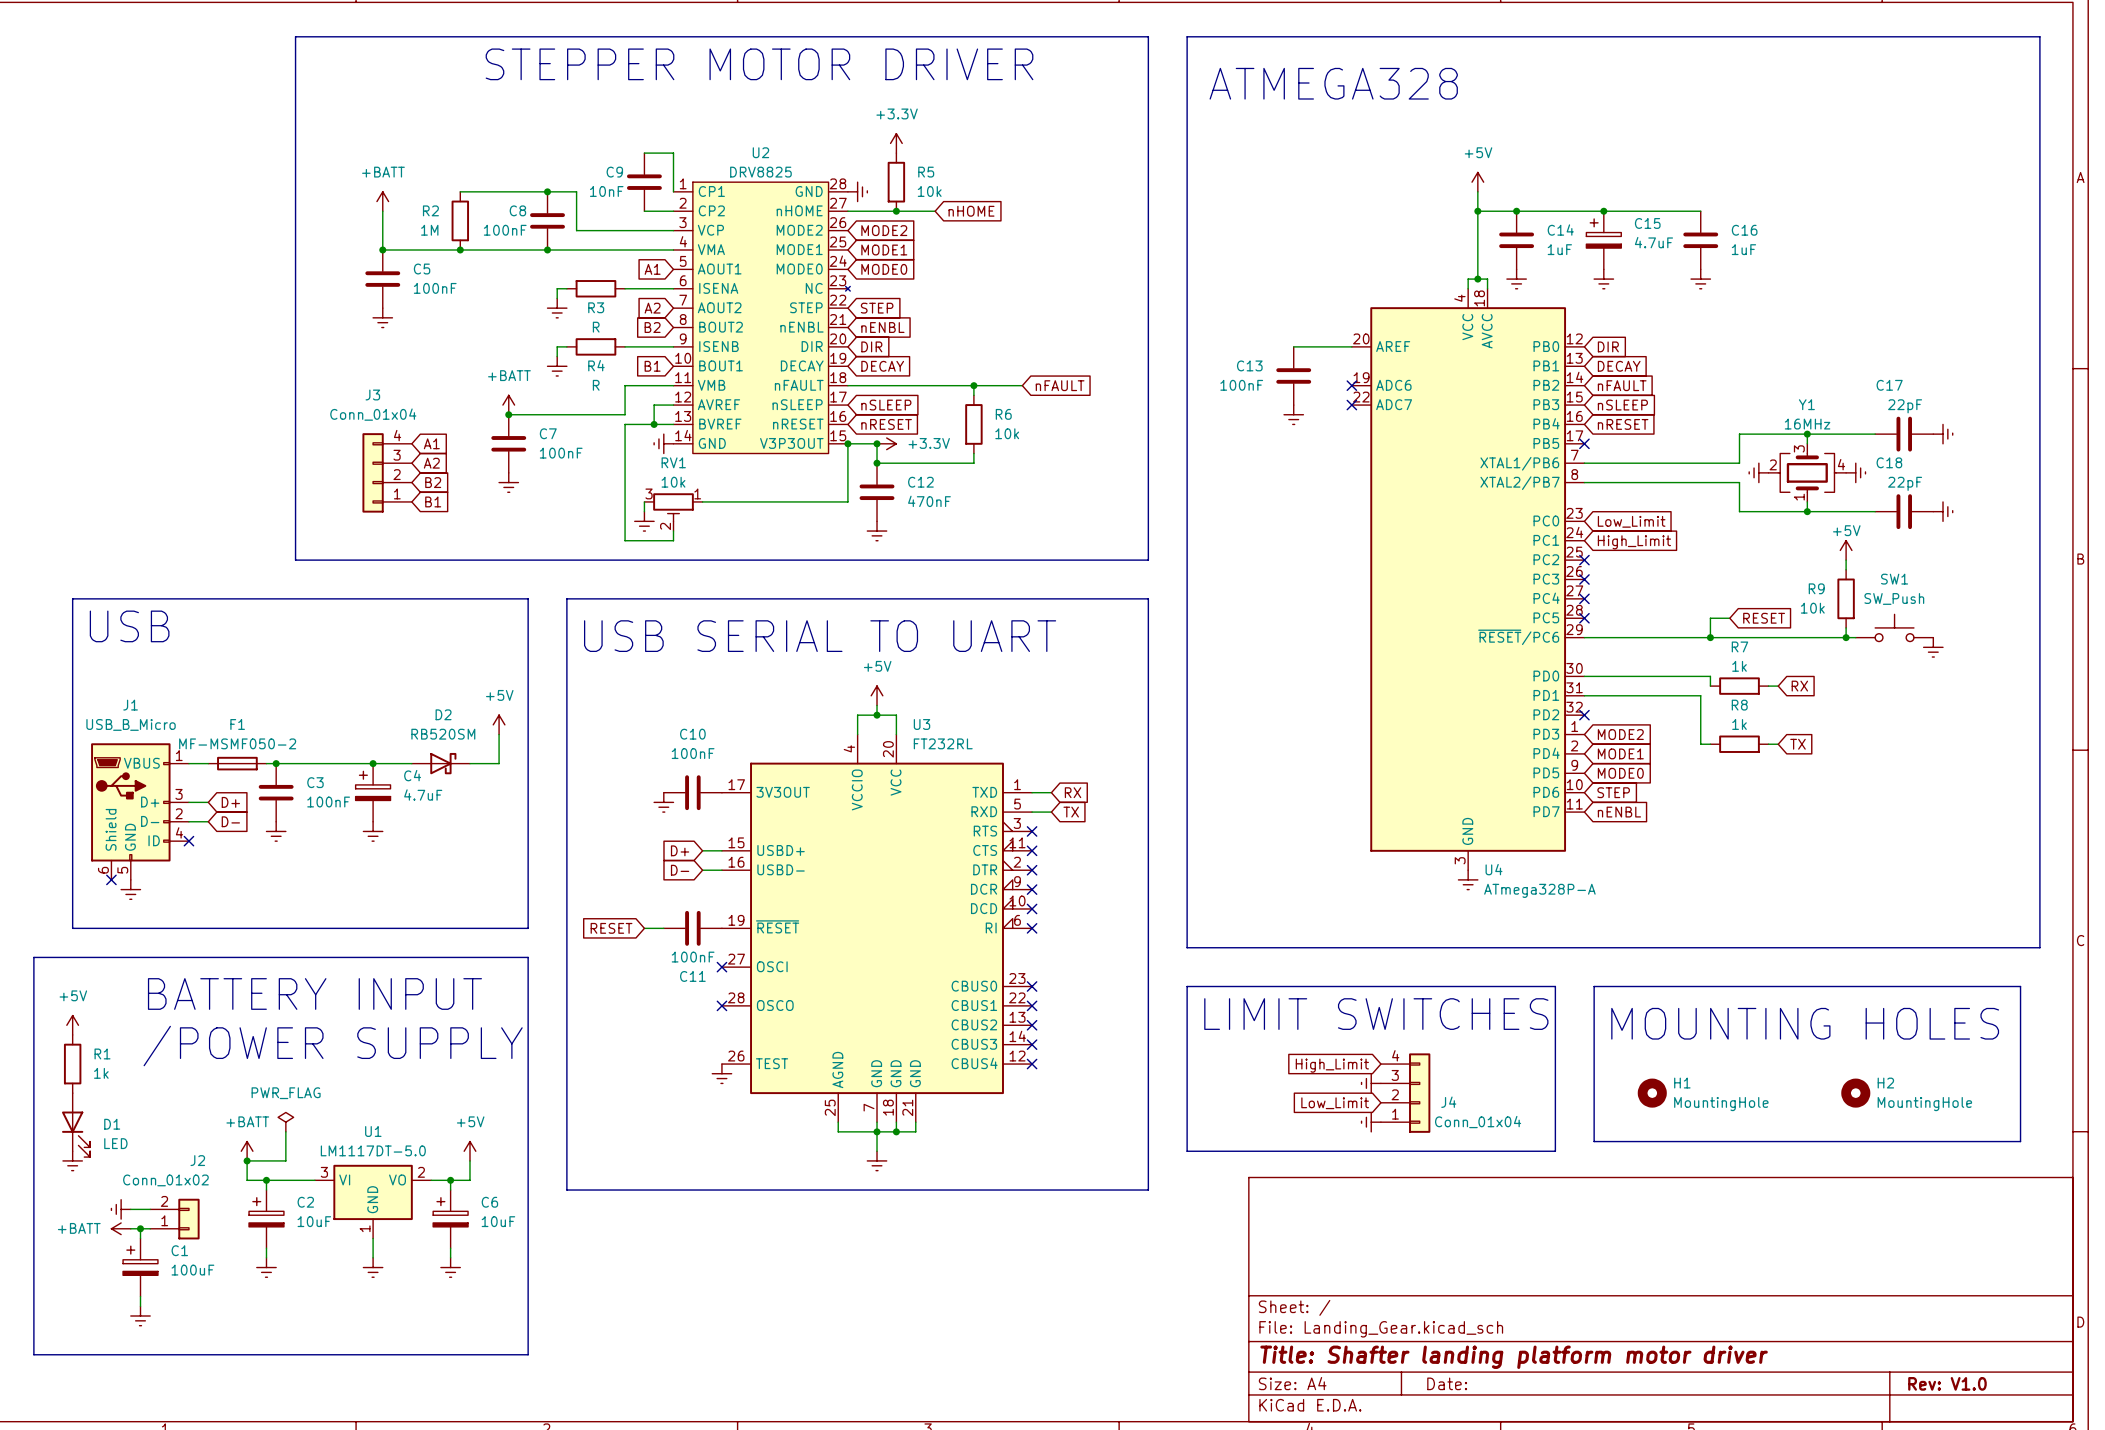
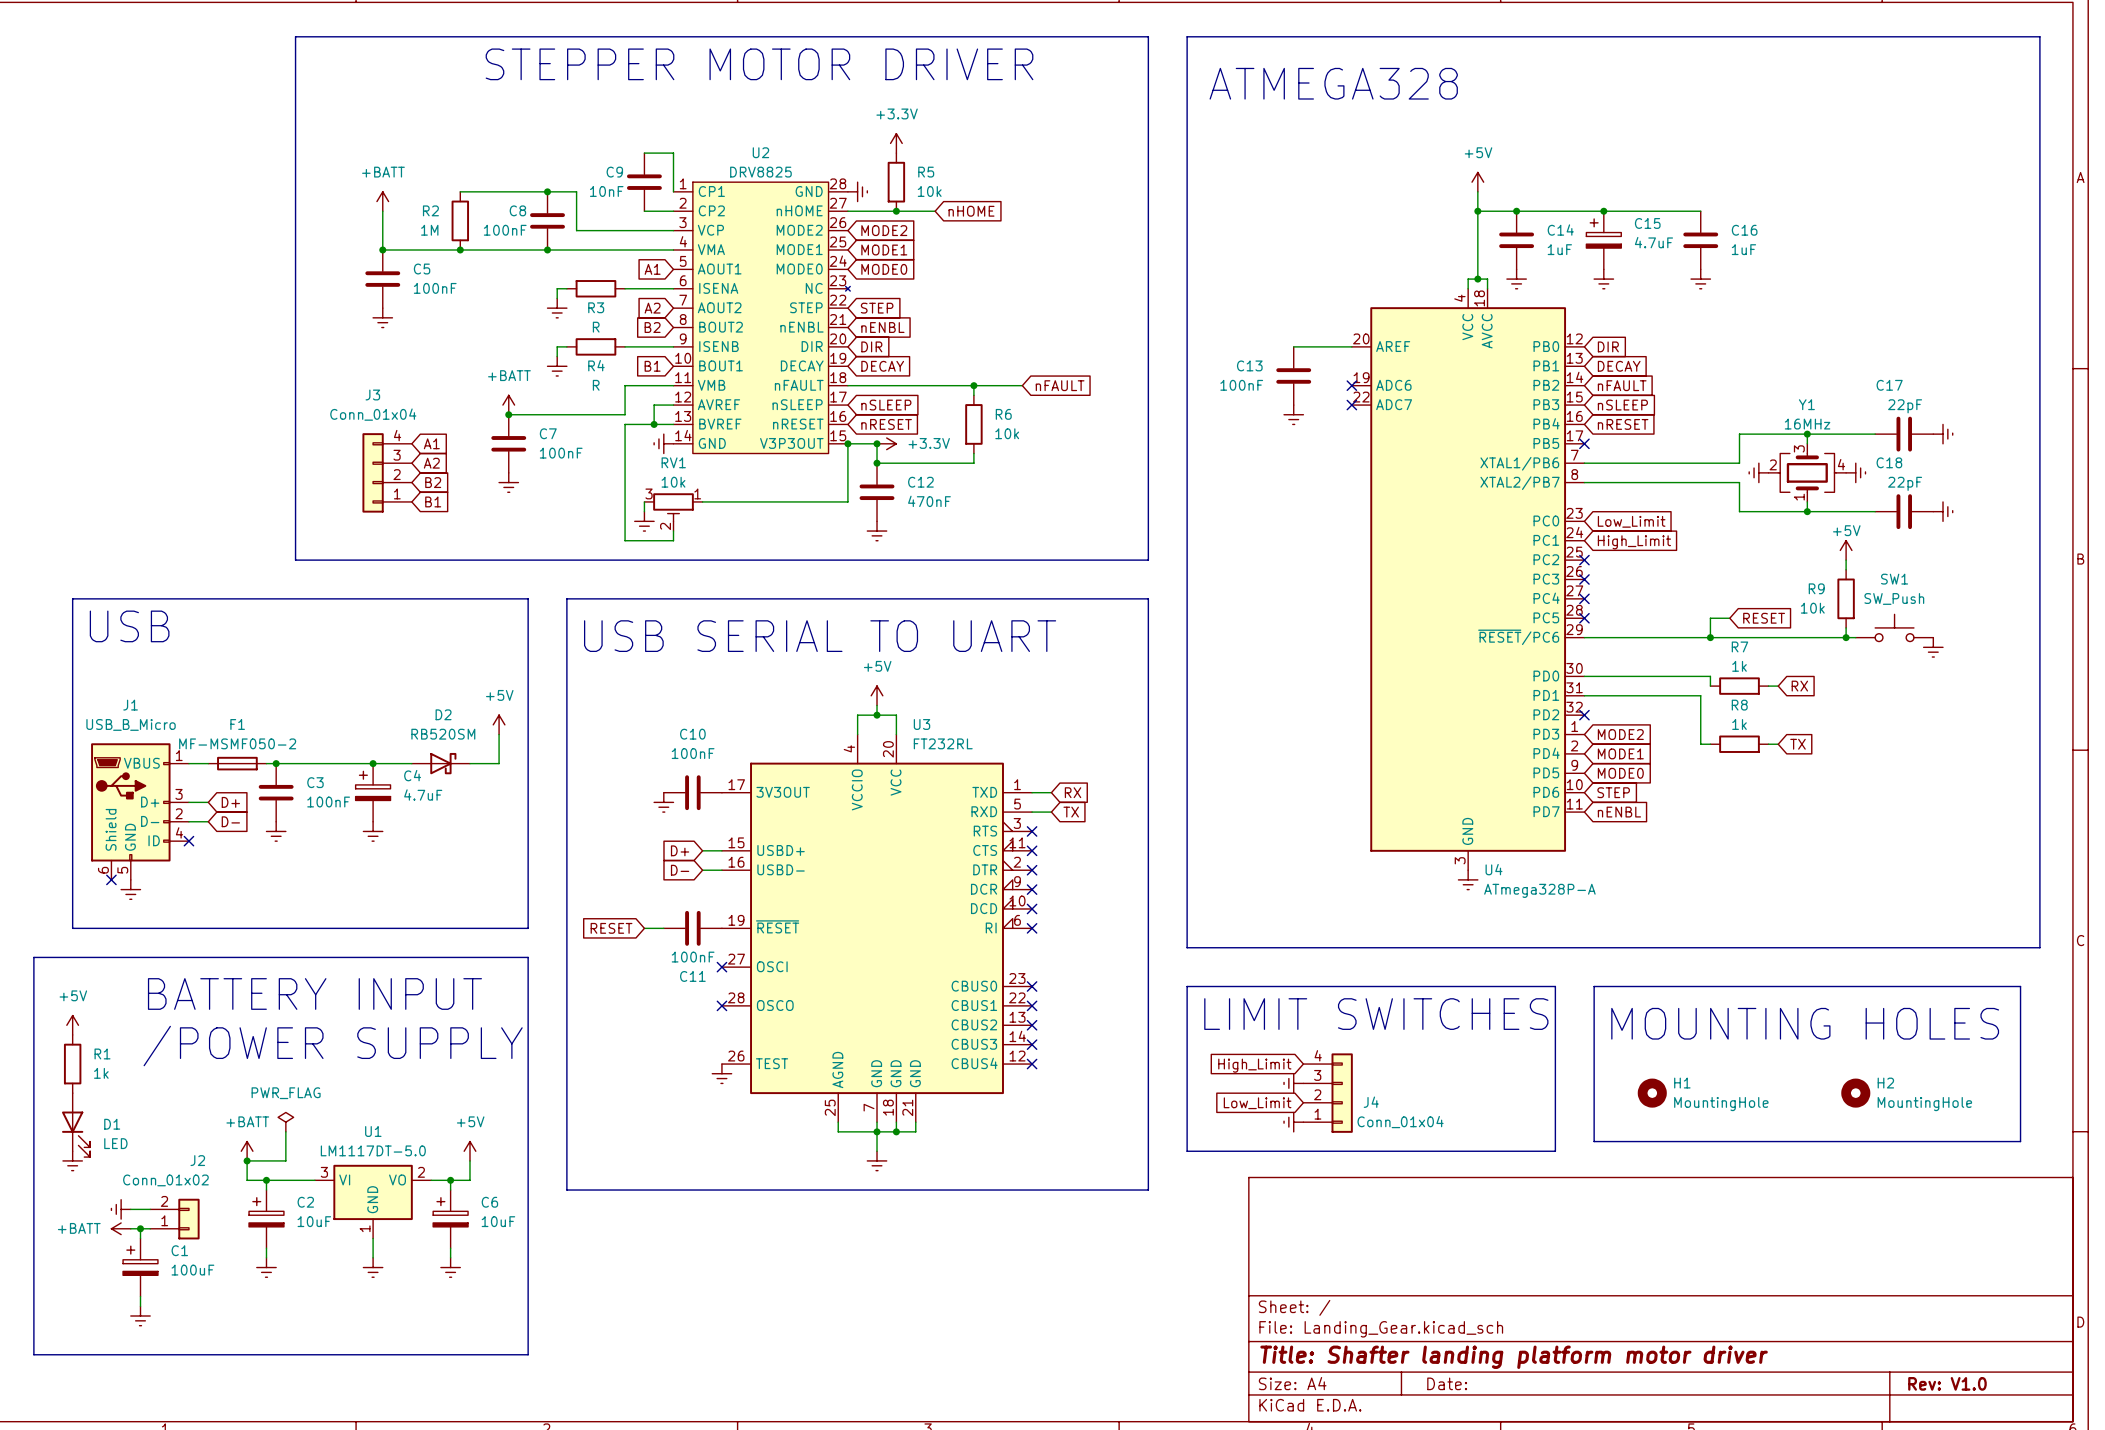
global label position: High_Limit (1332, 1065) -> High_Limit (1254, 1065)
power symbol: none -> (1293, 1083)
power symbol: (1371, 1083) -> none
J4 position: (1405, 1093) -> (1328, 1093)
global label position: Low_Limit (1335, 1103) -> Low_Limit (1257, 1103)
power symbol: none -> (1293, 1122)
power symbol: (1371, 1122) -> none

